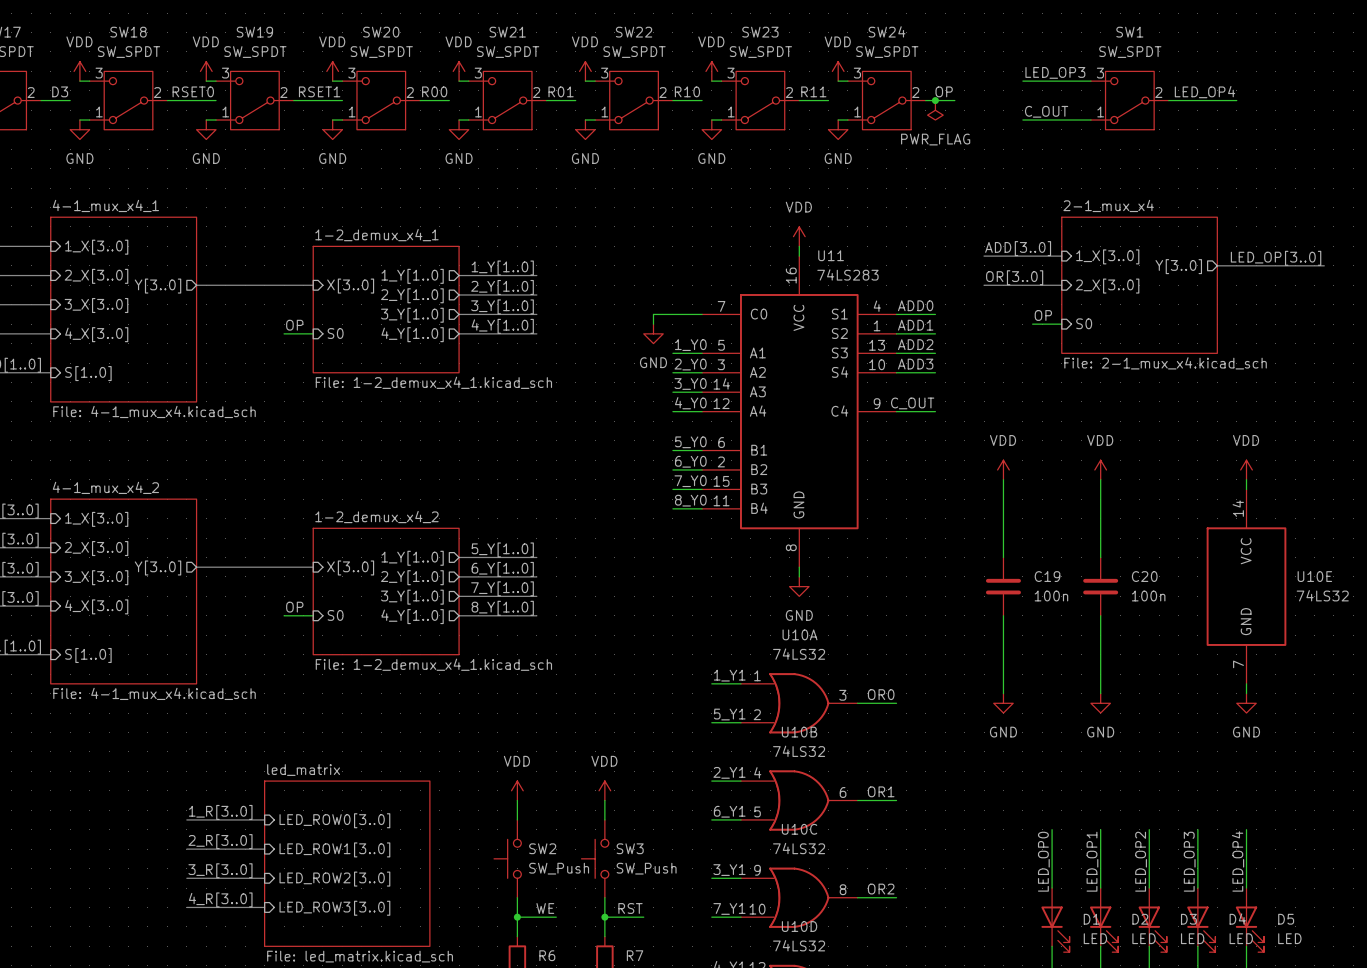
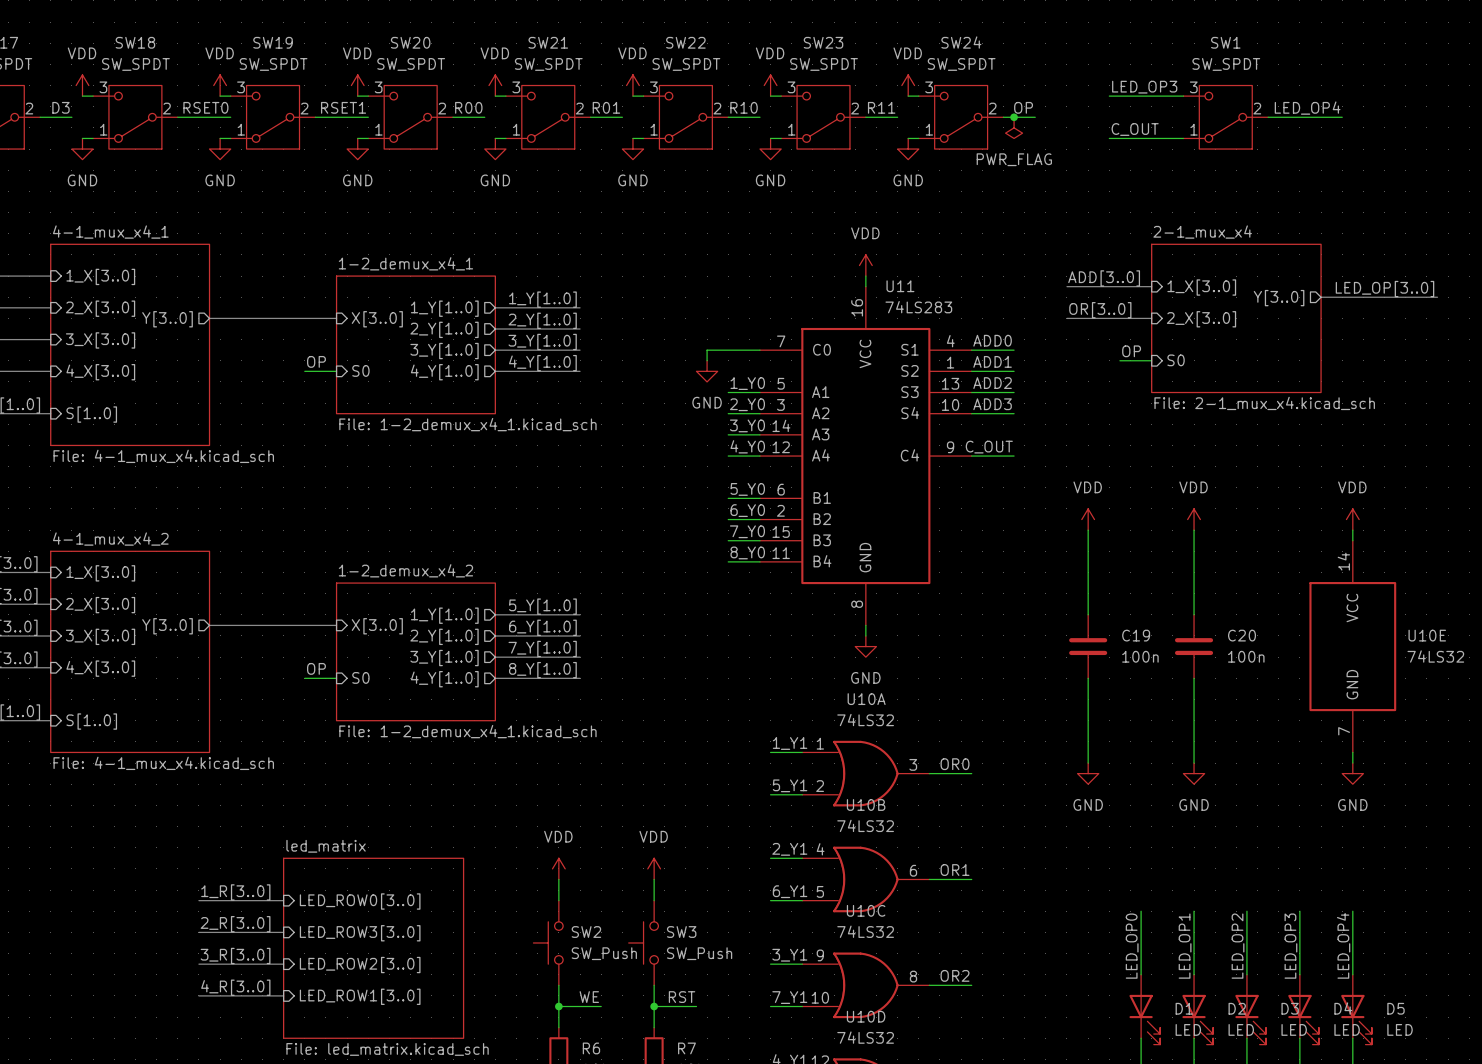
sheet pin: LED_ROW1[3..0] (334, 849) -> LED_ROW3[3..0] (360, 933)
sheet pin: LED_ROW3[3..0] (334, 908) -> LED_ROW1[3..0] (360, 996)

